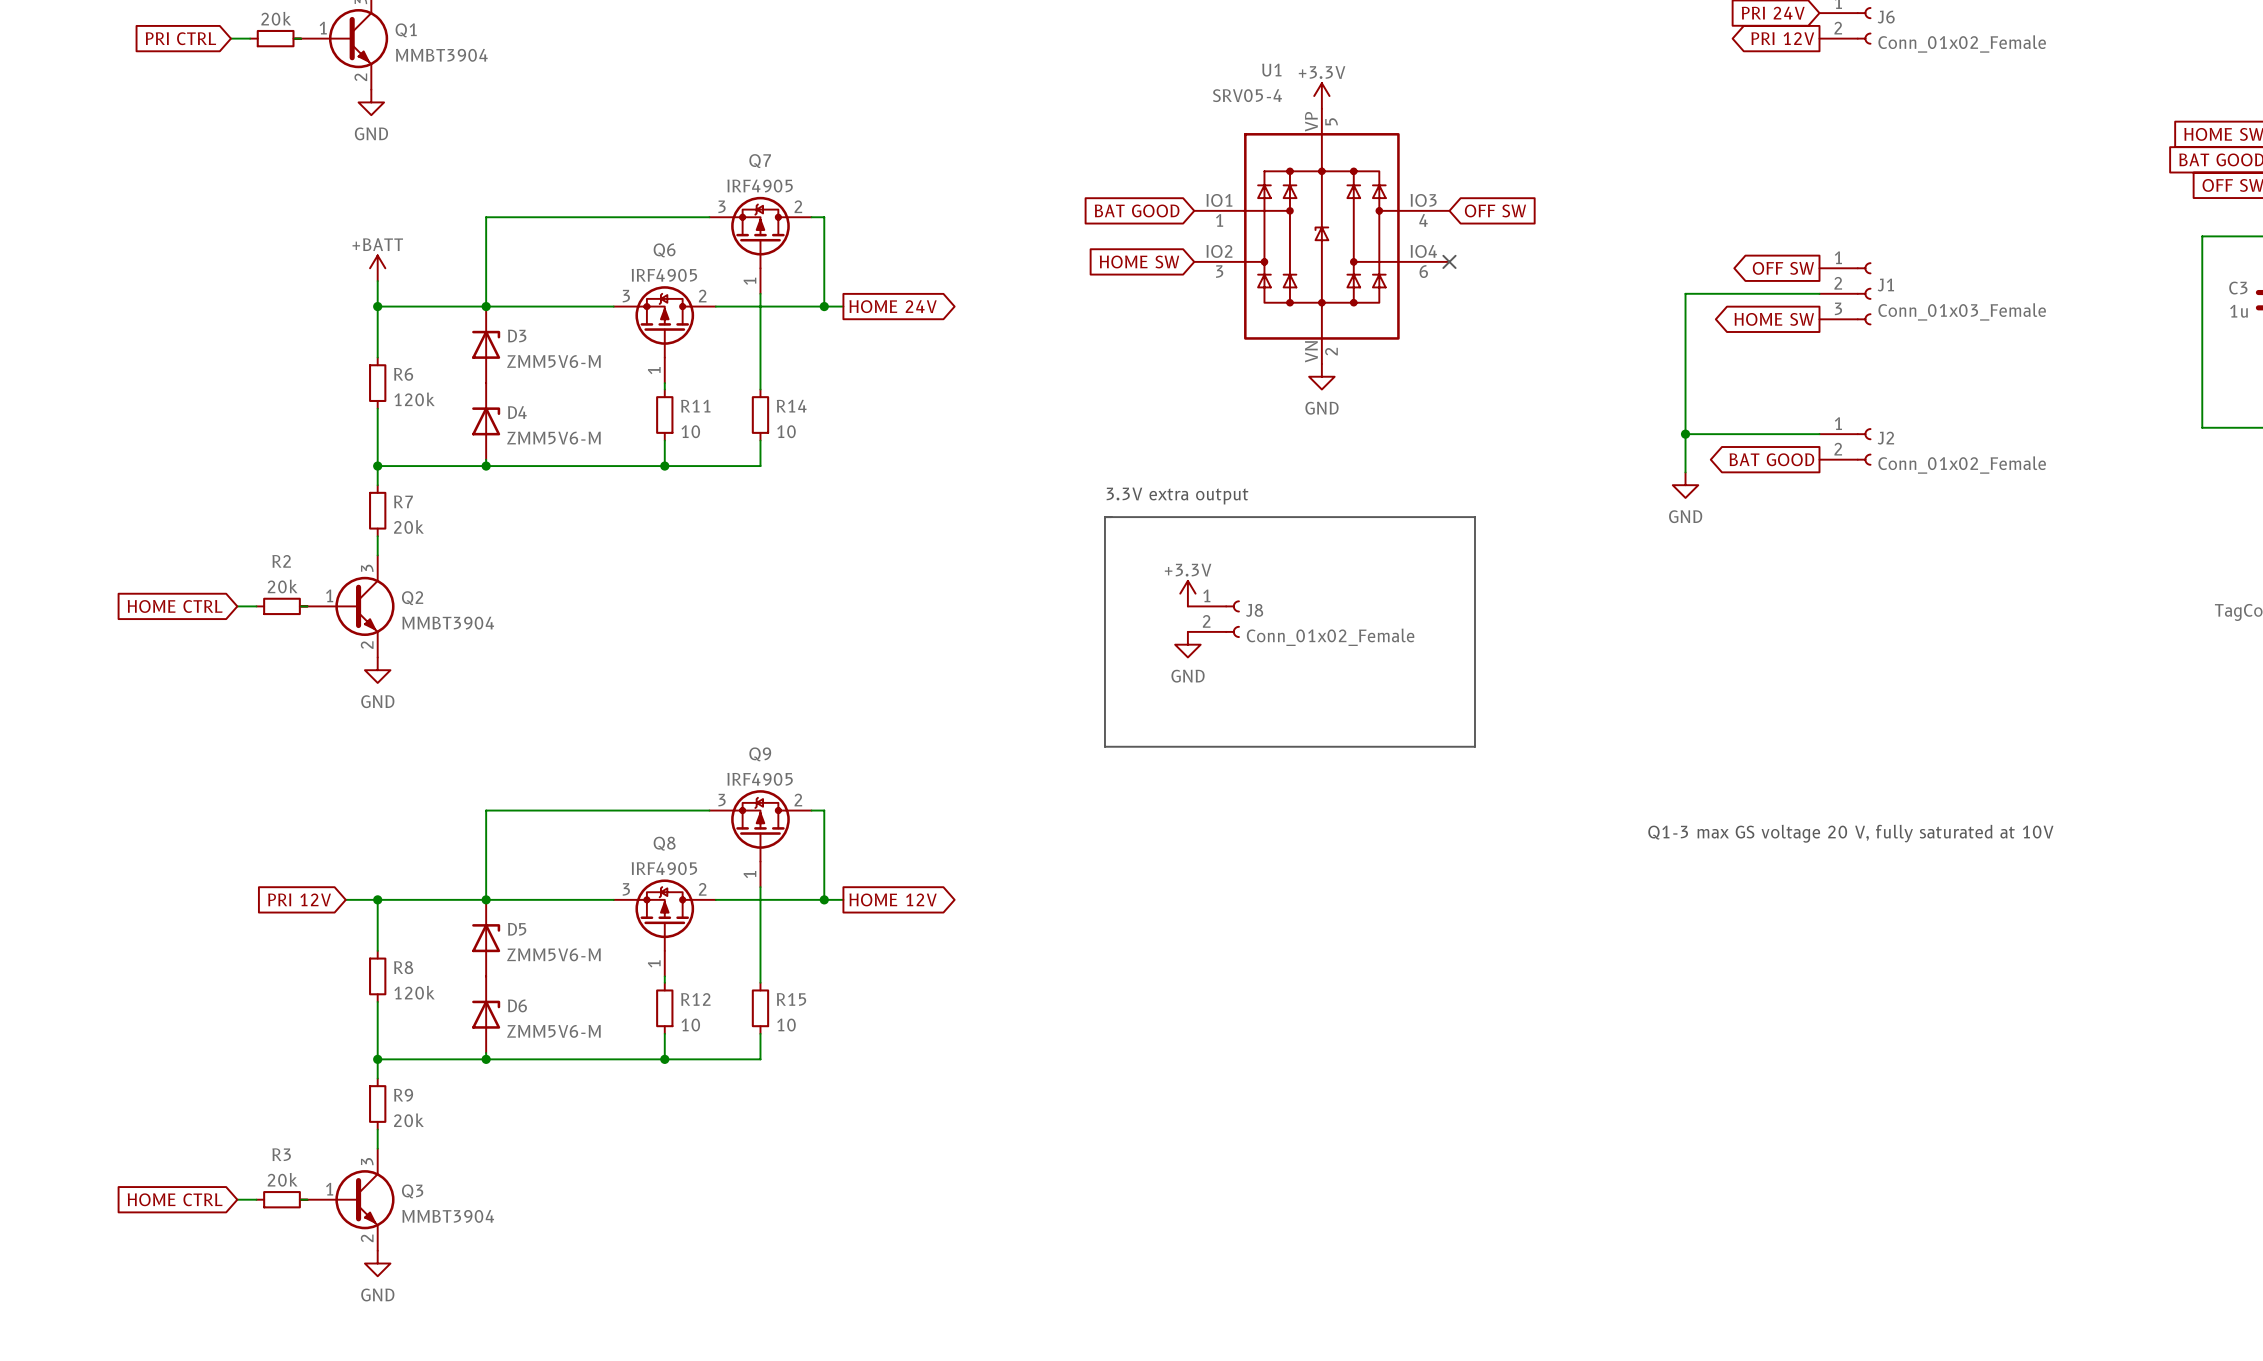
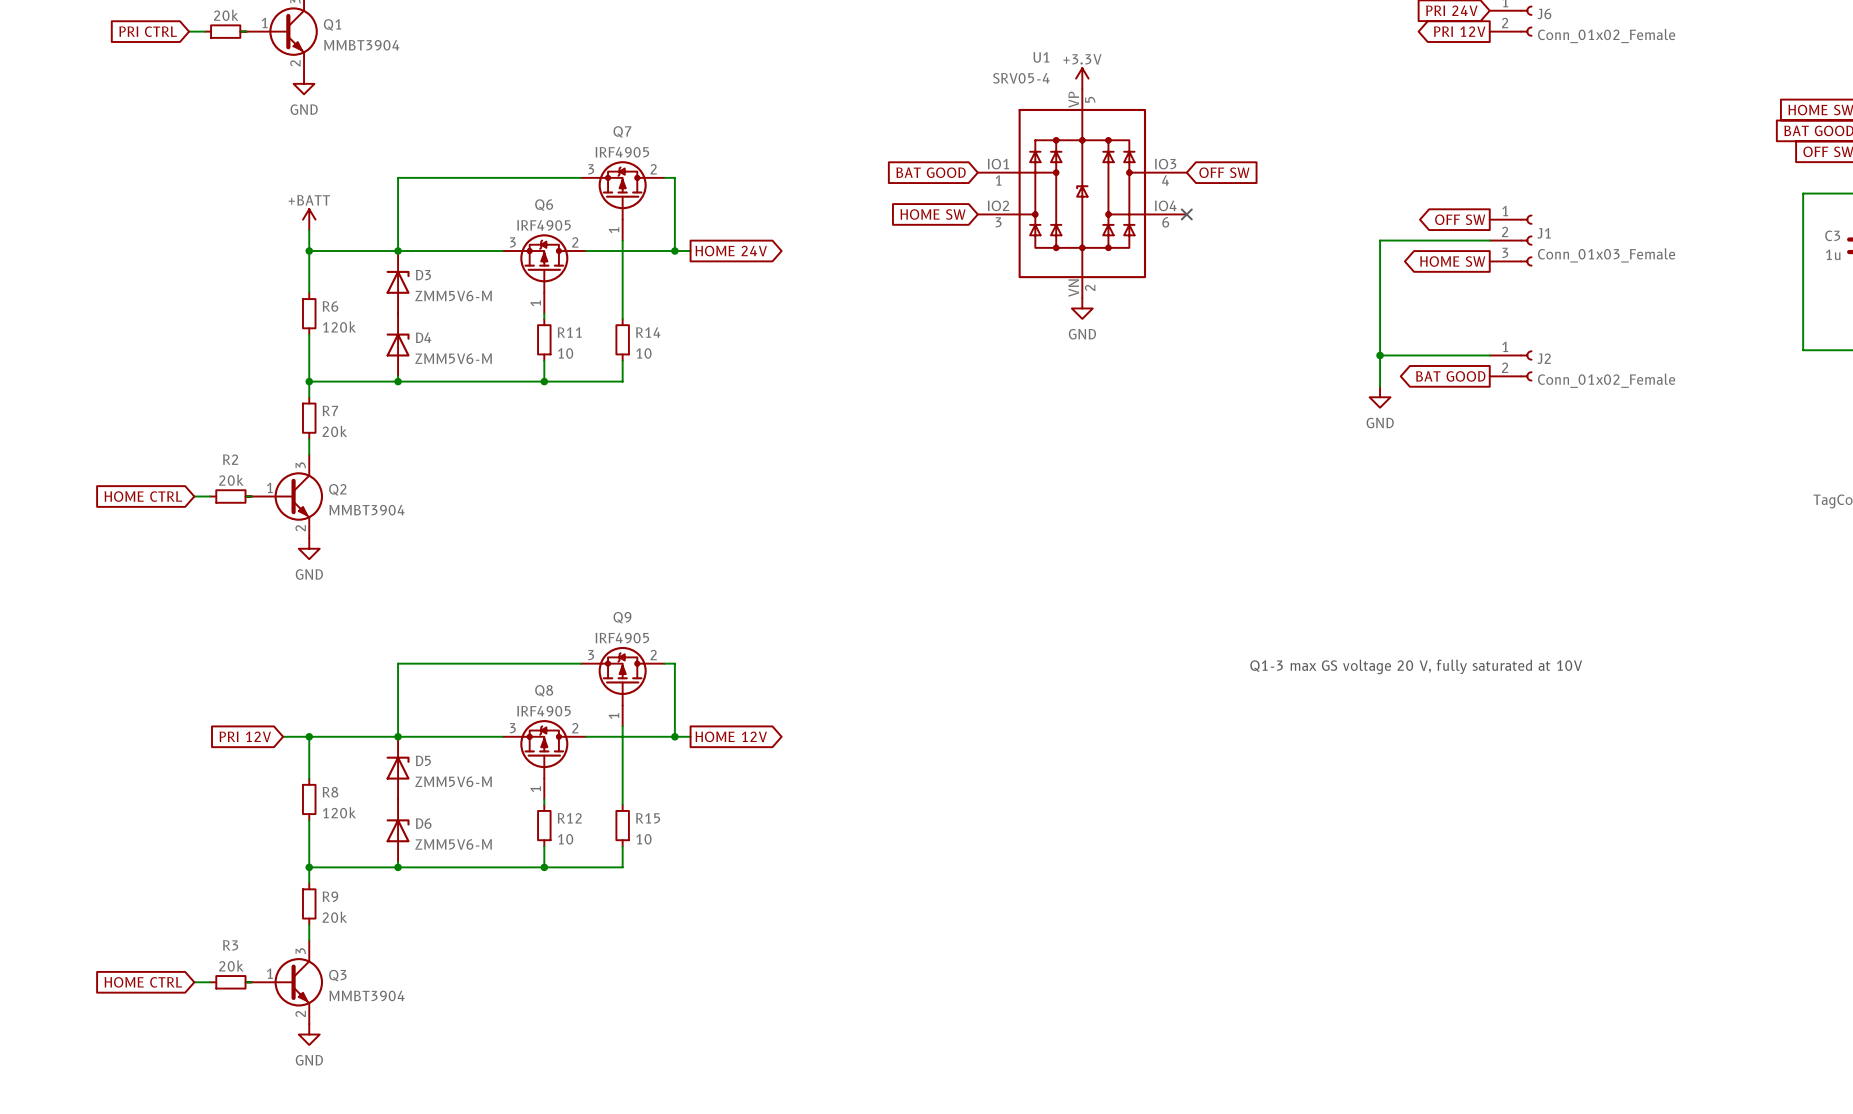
text: 3.3V extra output (1177, 495) -> none
line: (1104, 517) (1474, 517) (1474, 746) (1104, 746) (1104, 517) -> none
power symbol: +3.3V (1187, 593) -> none
J8: Conn_01x02_Female (1213, 619) -> none
power symbol: GND (1187, 644) -> none
text position: Q1-3 max GS voltage 20 V, fully saturated at 10V (1850, 833) -> Q1-3 max GS voltage 20 V, fully saturated at 10V (1416, 666)

